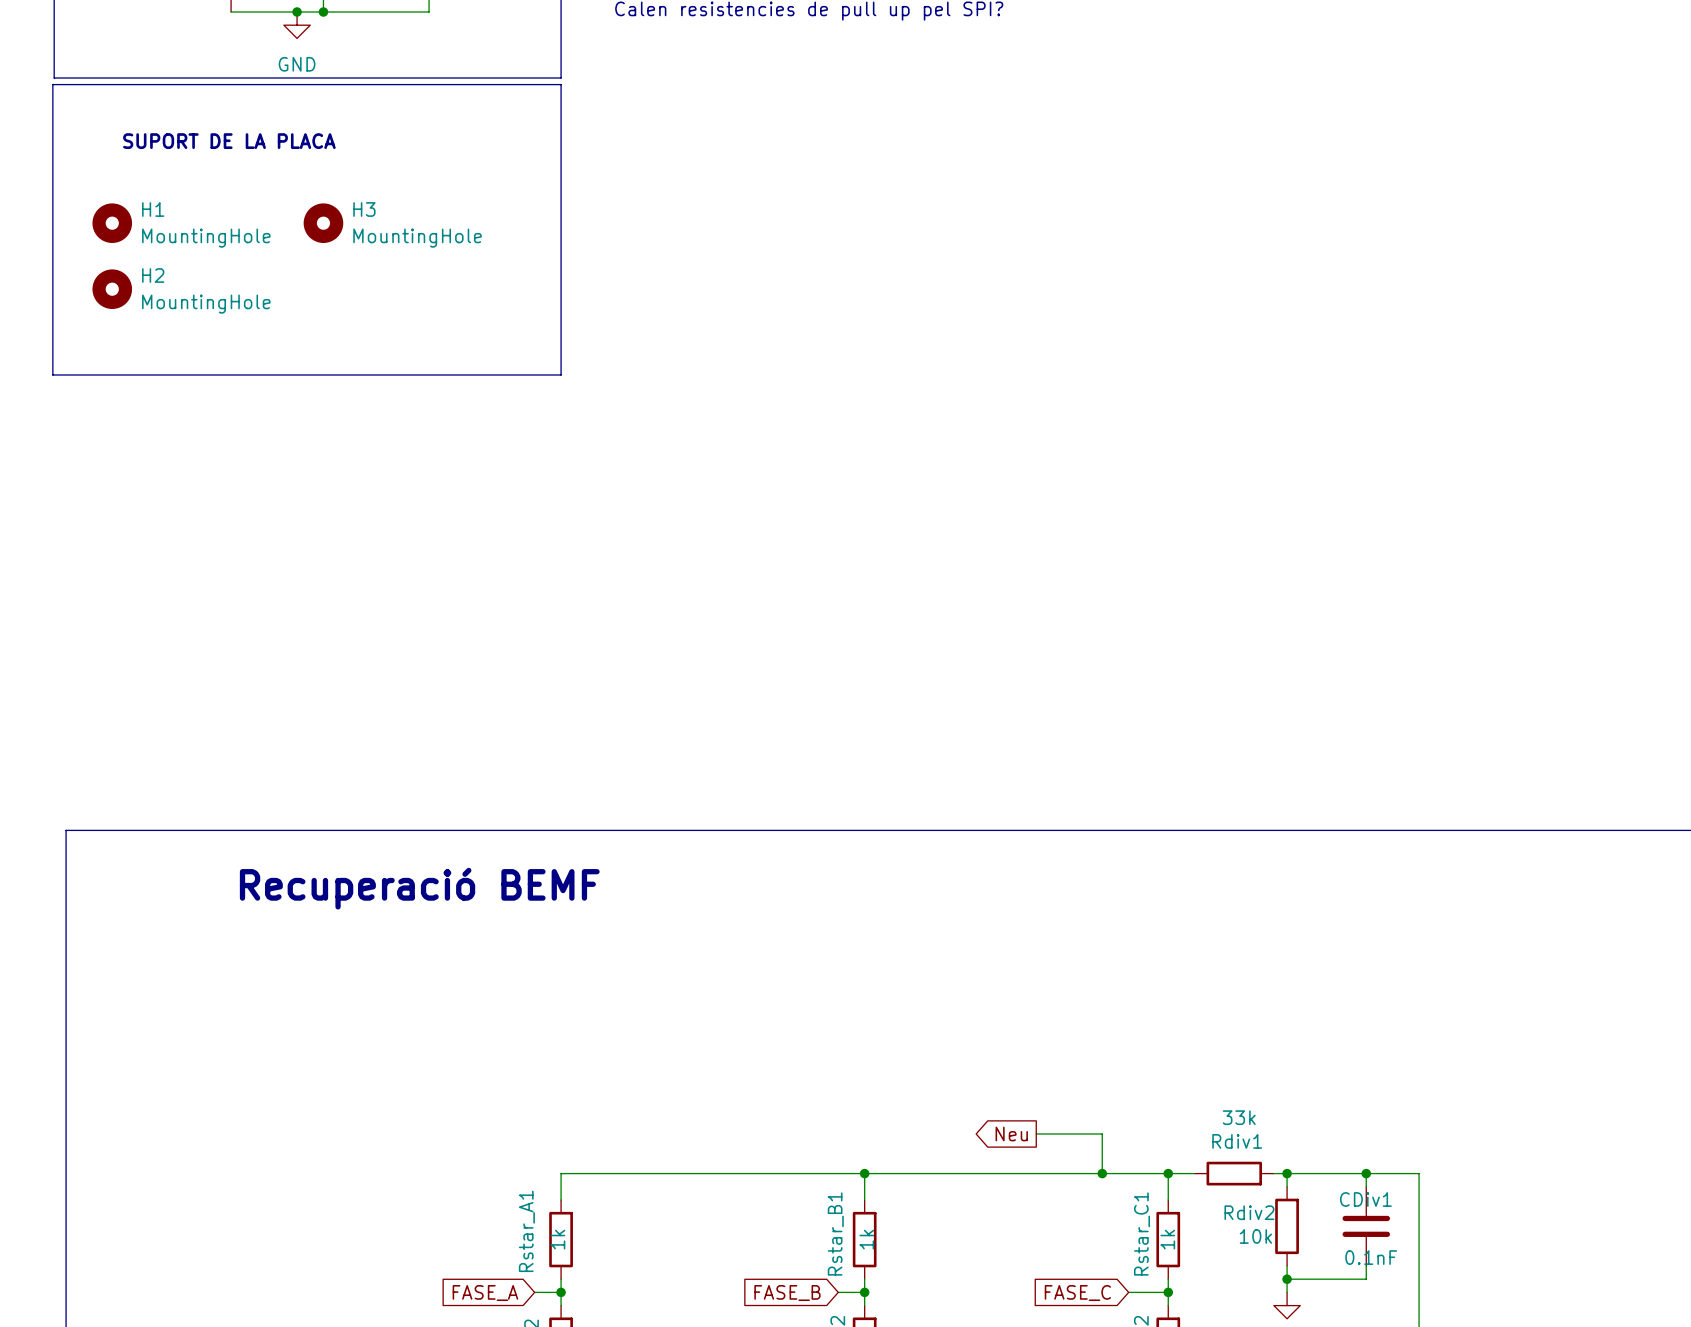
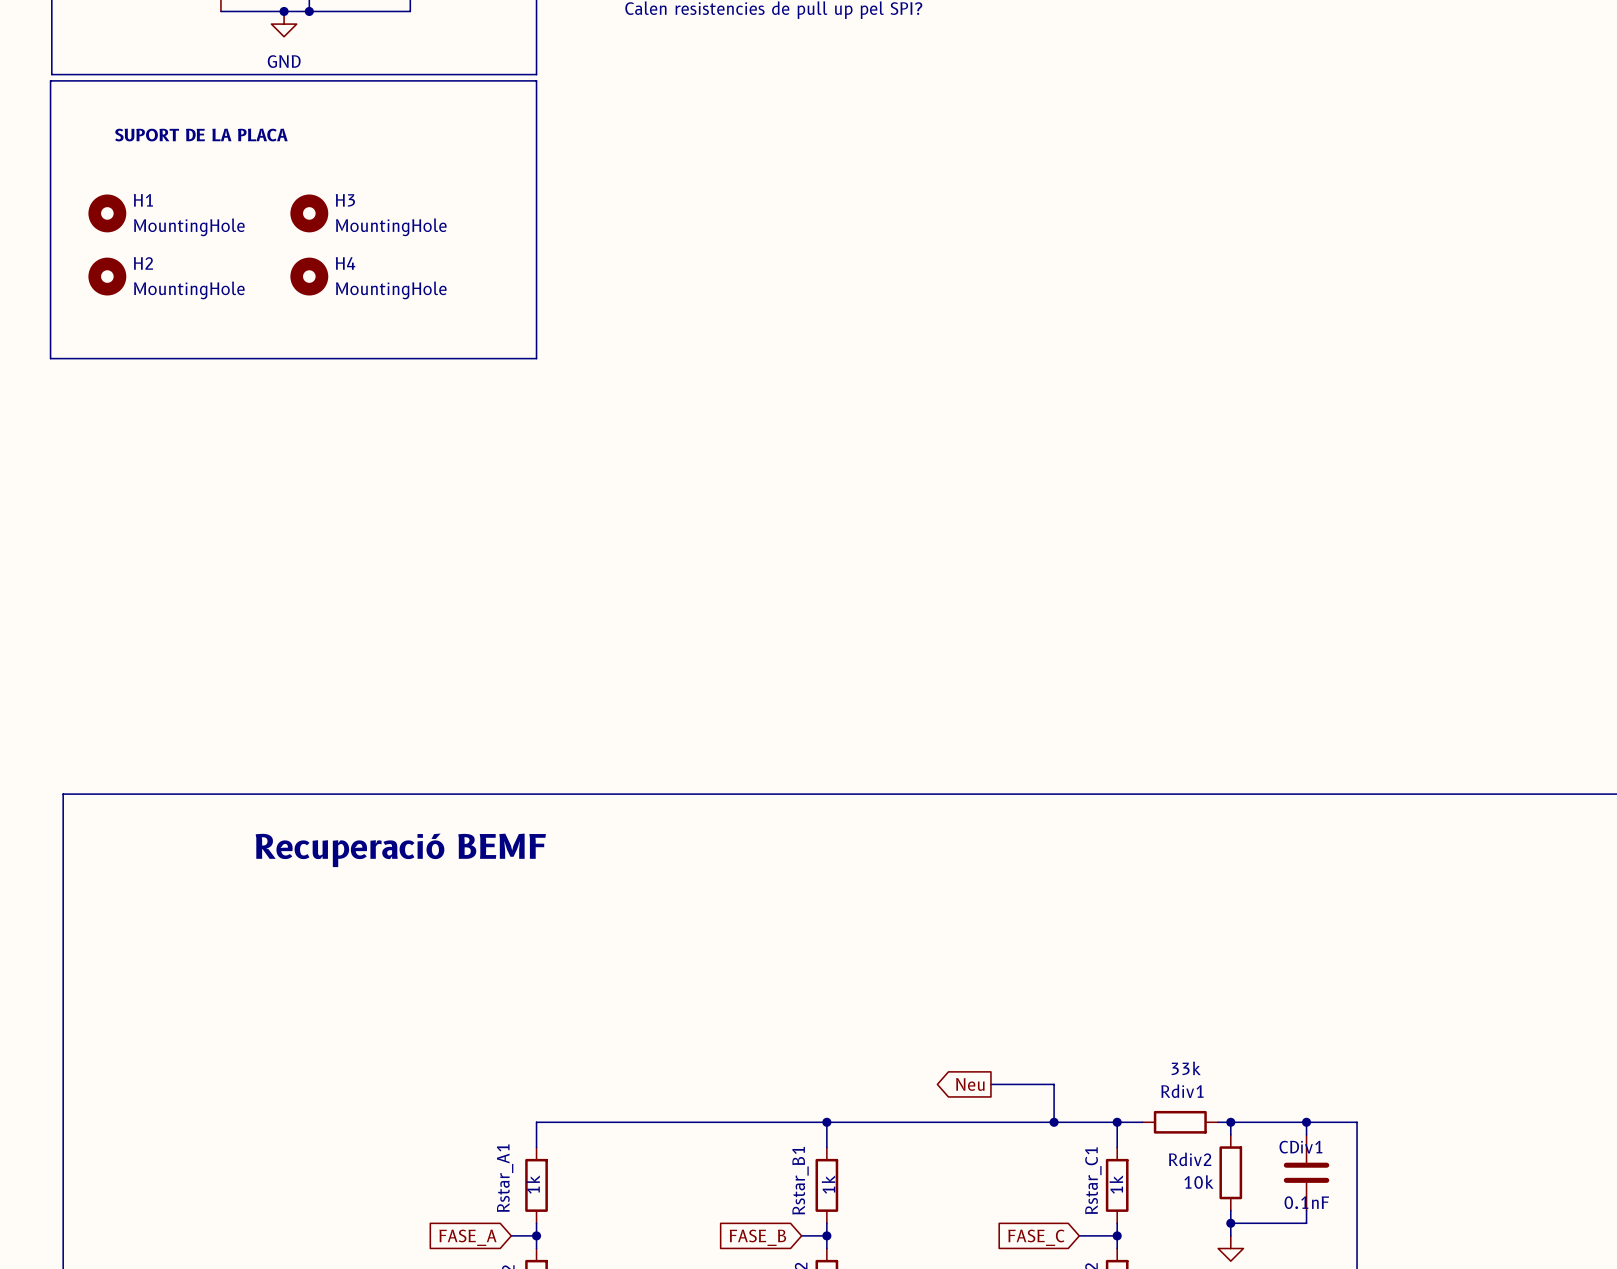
H4: none -> MountingHole (309, 276)

